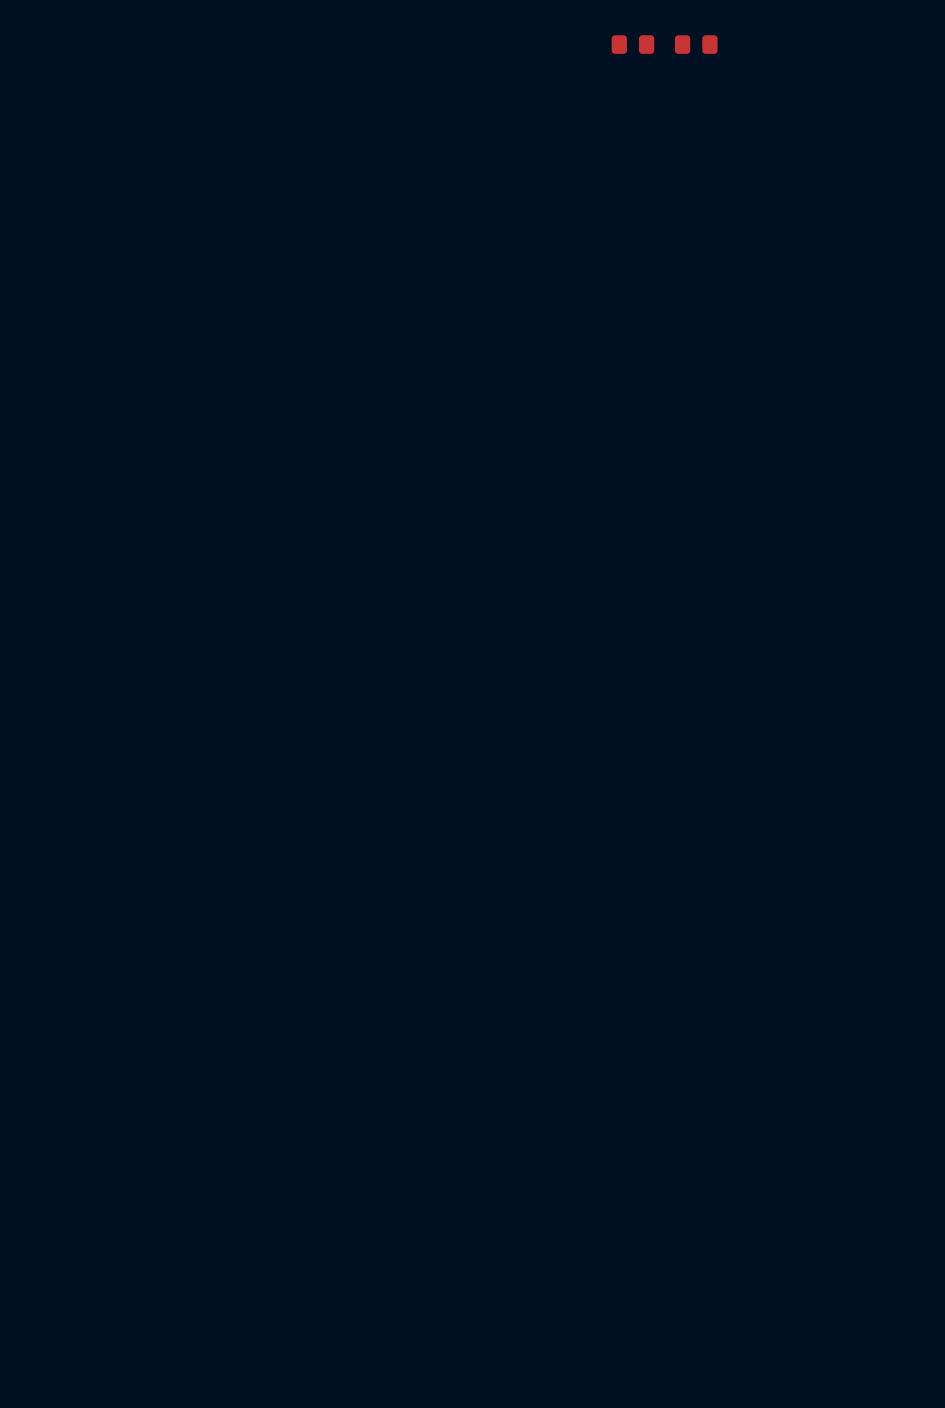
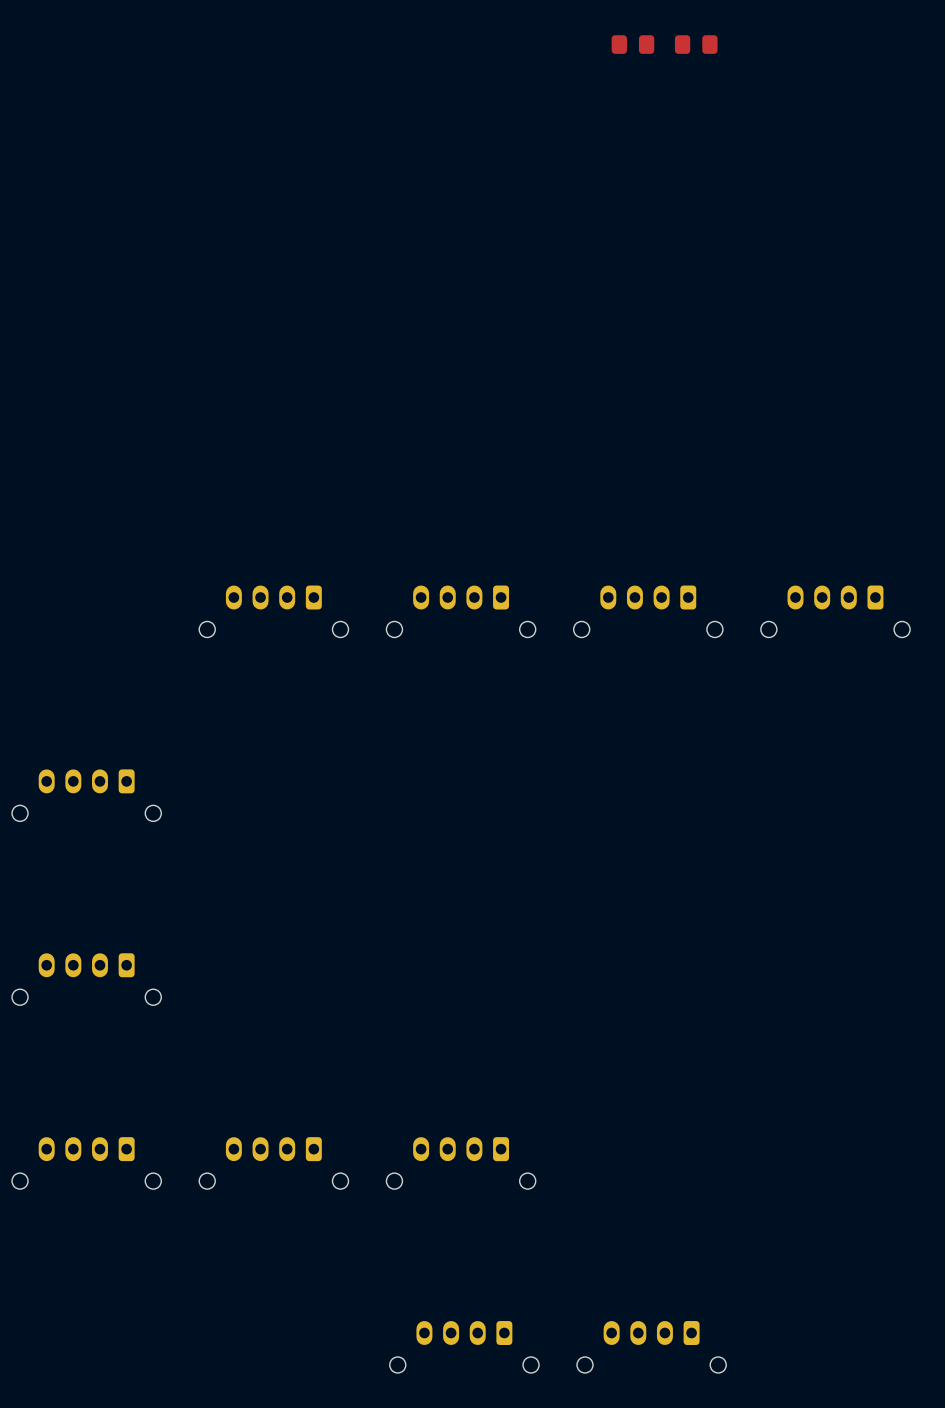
part: none -> (273, 611)
part: none -> (461, 611)
part: none -> (648, 611)
part: none -> (835, 611)
part: none -> (86, 795)
part: none -> (86, 979)
part: none -> (86, 1163)
part: none -> (273, 1163)
part: none -> (461, 1163)
part: none -> (464, 1346)
part: none -> (651, 1346)

